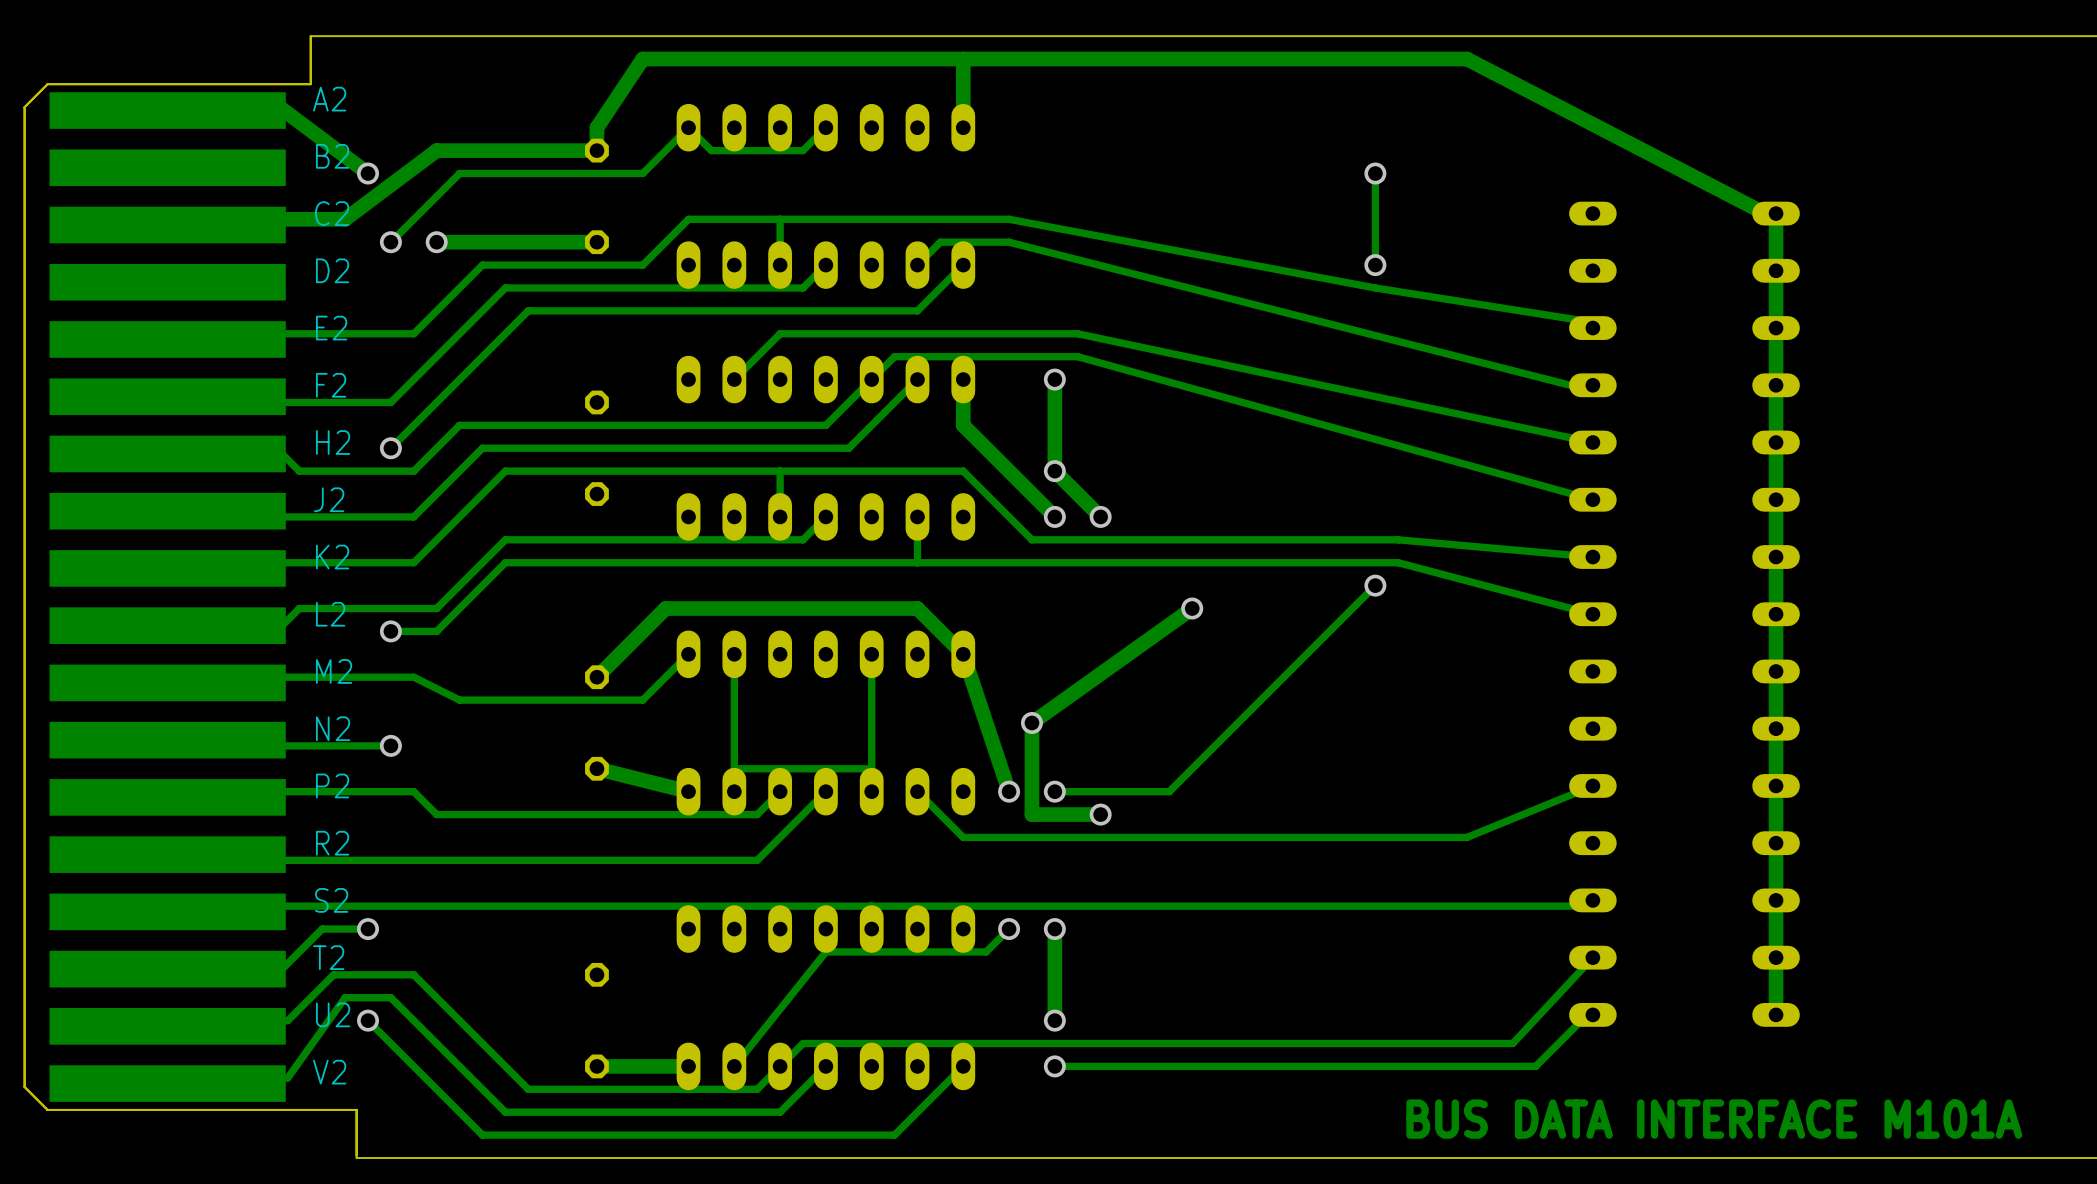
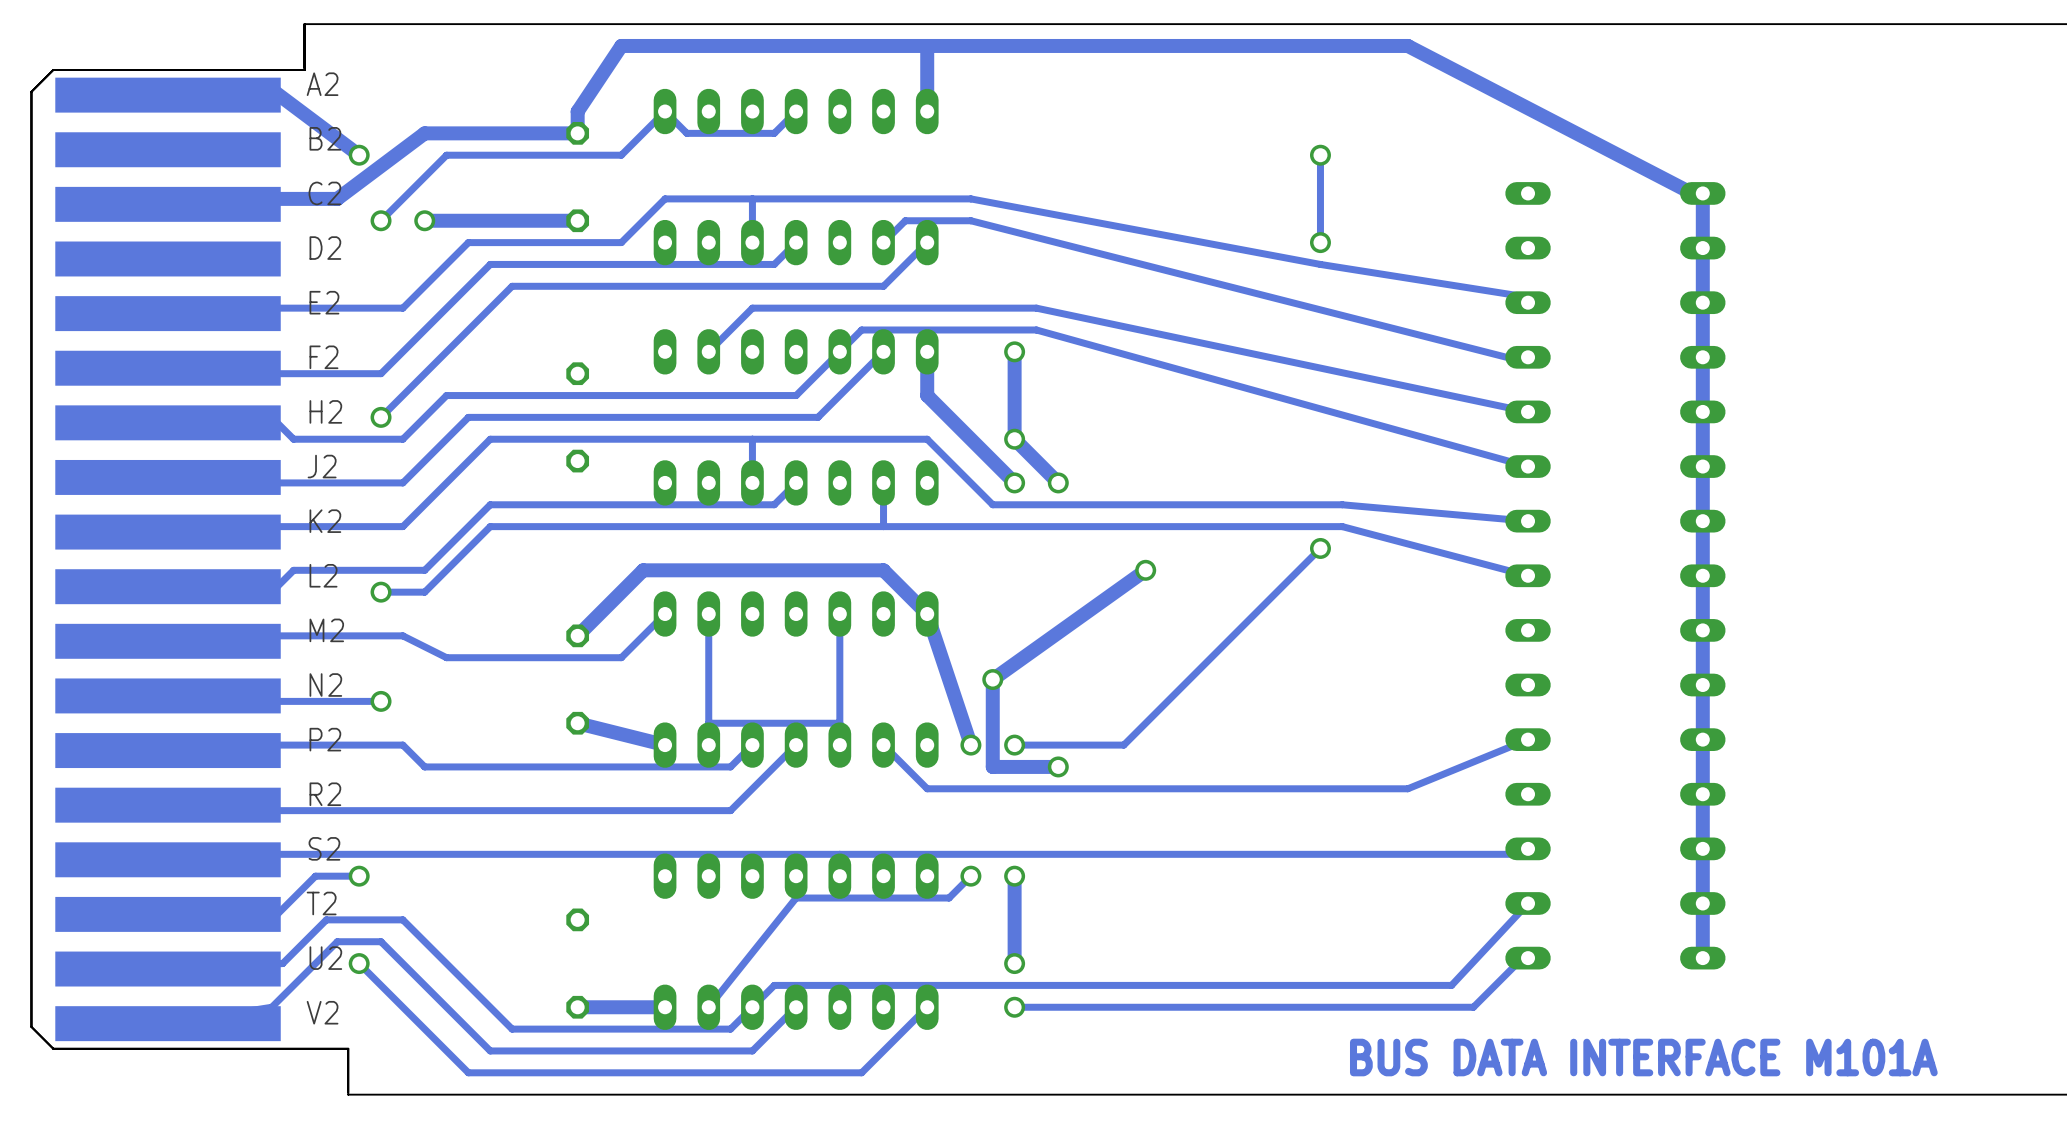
track: (345, 997) (287, 1077) (167, 1083) -> (337, 941) (271, 1007) (168, 1023)

